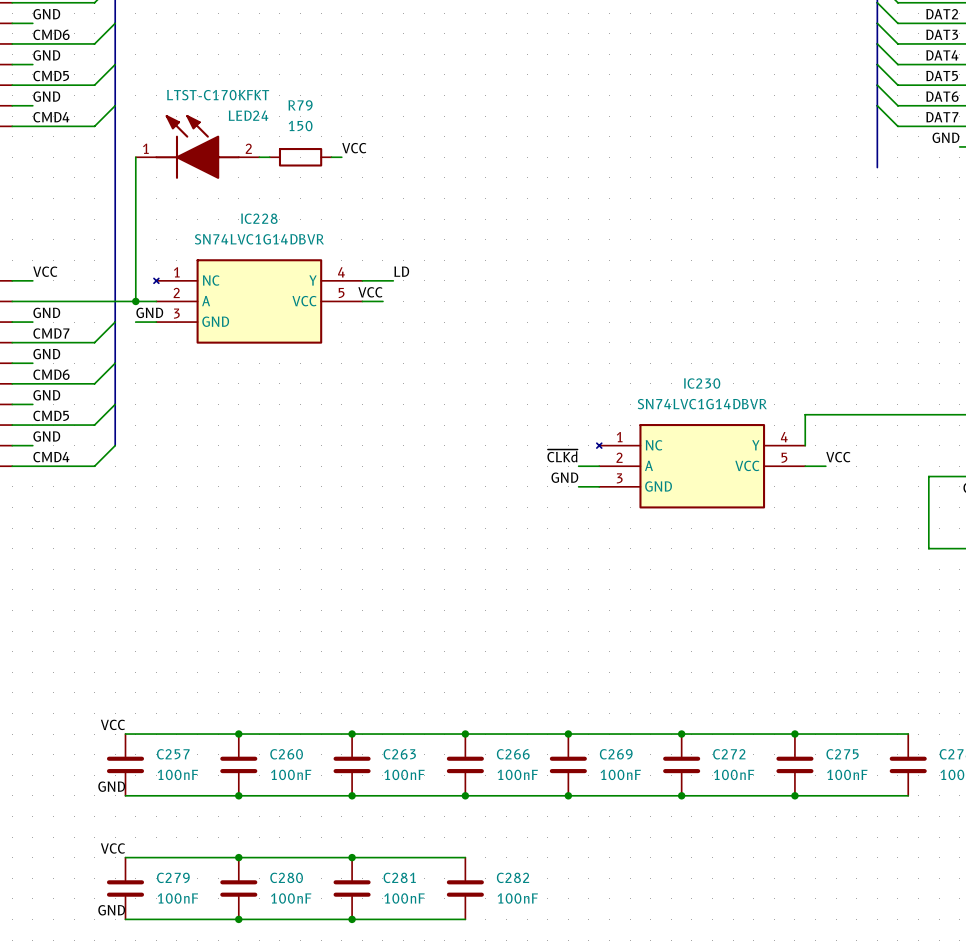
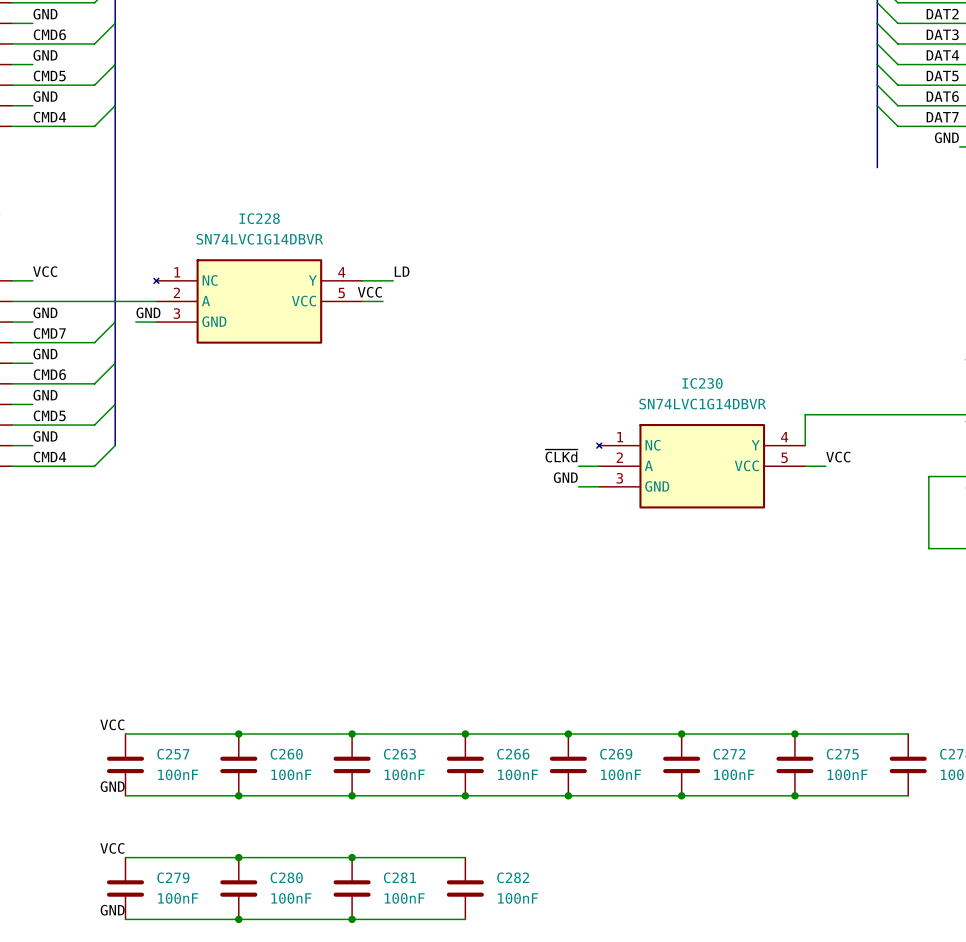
LED24: LTST-C170KFKT (197, 146) -> none
label: VCC (354, 148) -> none
wire: (135, 157) (135, 301) -> none
wire: (259, 157) (269, 157) -> none
R79: 150 (300, 157) -> none
wire: (331, 157) (341, 157) -> none
junction: (135, 301) -> none

